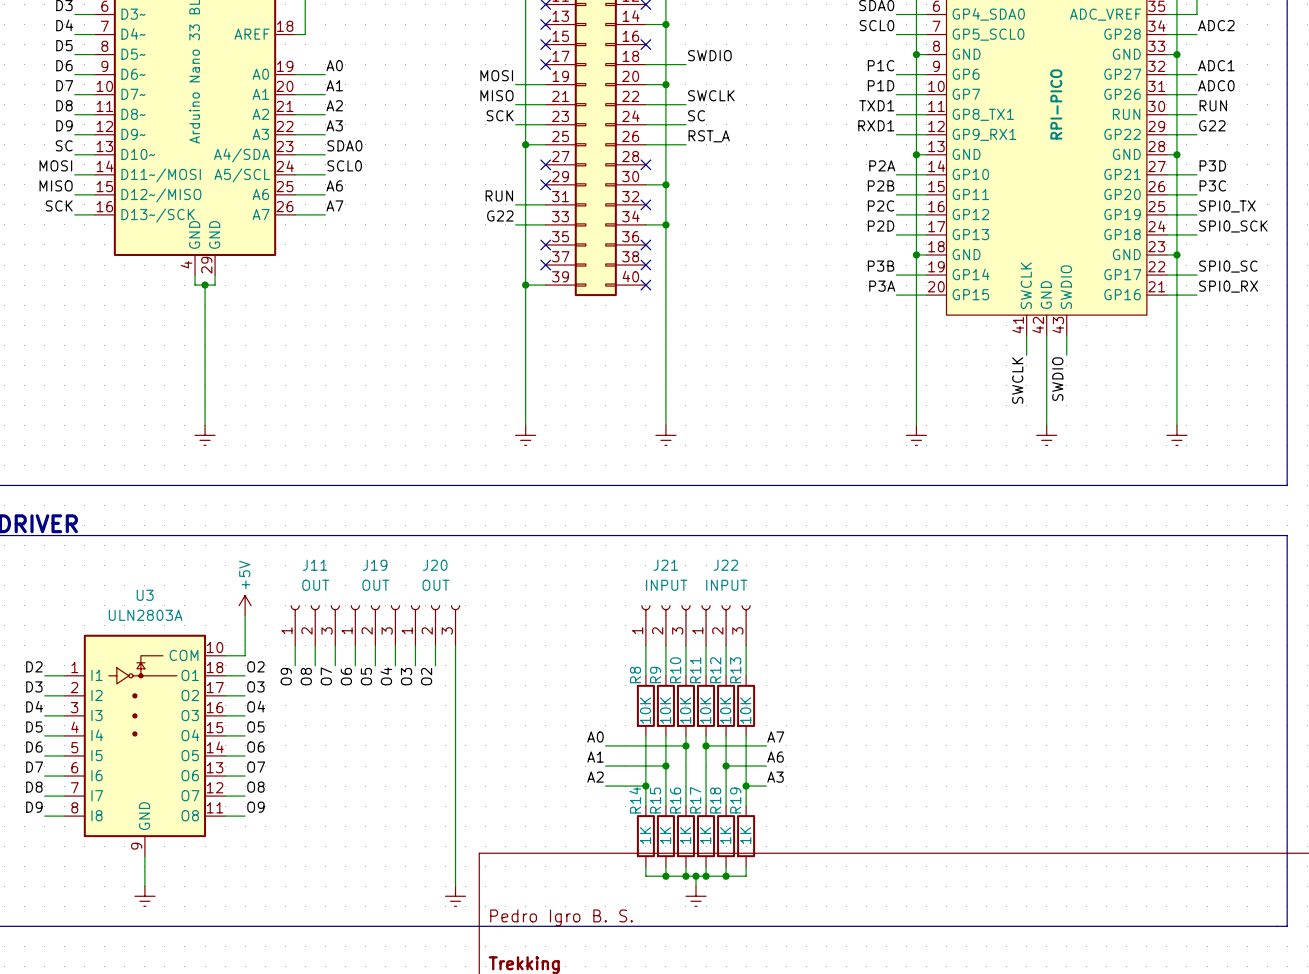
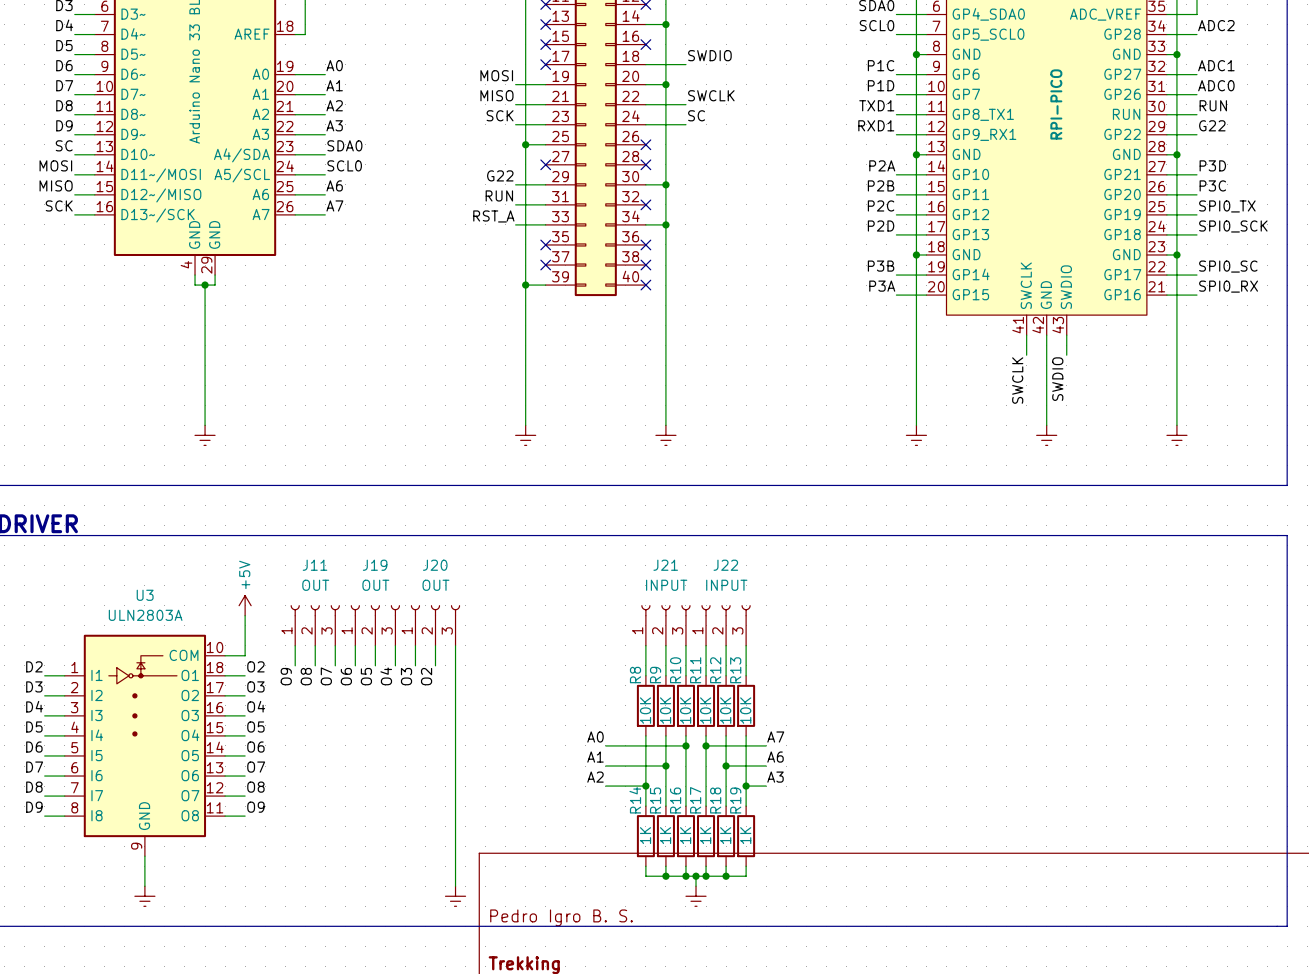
label: RST_A (709, 136) -> none
wire: (645, 144) (685, 144) -> none
no-connect mark: none -> (645, 144)
label: none -> G22 (500, 175)
wire: none -> (515, 184) (545, 184)
no-connect mark: (545, 184) -> none
label: G22 (500, 215) -> RST_A (493, 216)

